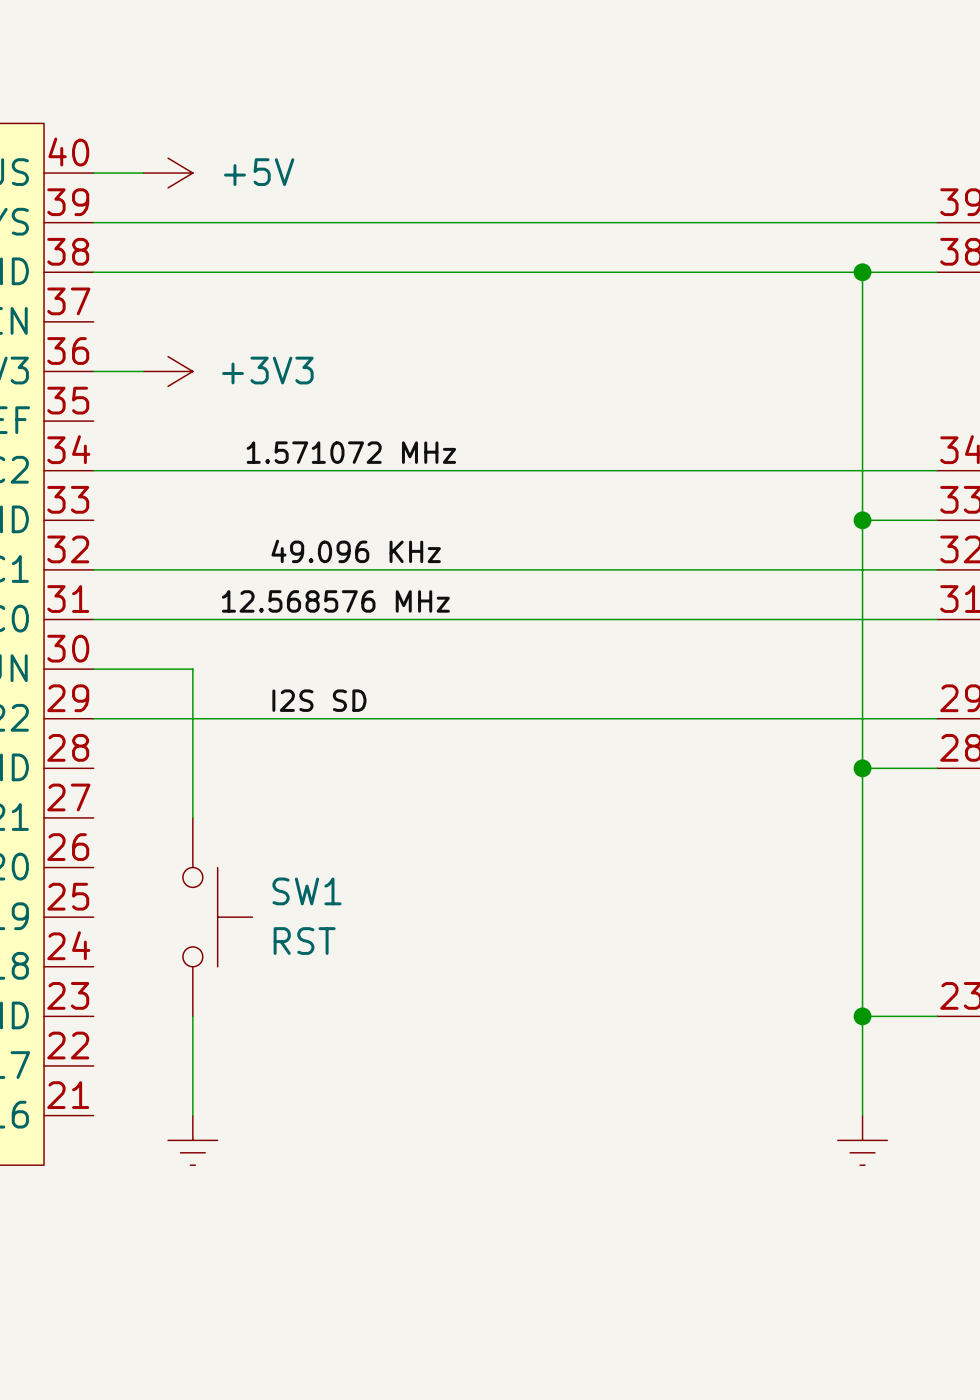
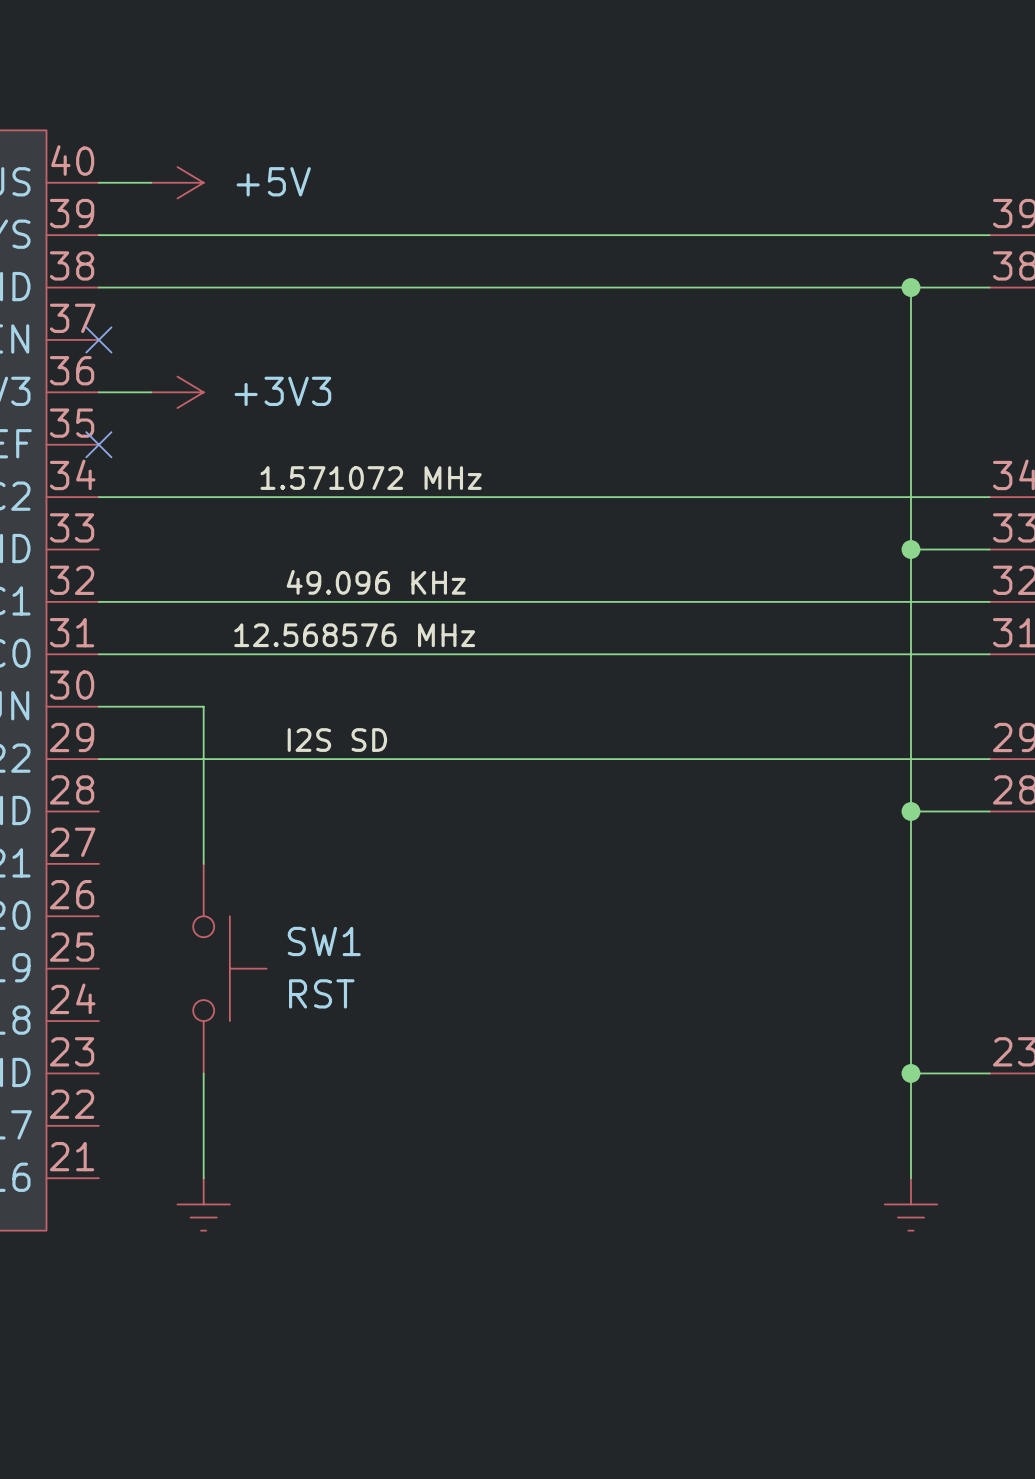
no-connect mark: none -> (98, 339)
no-connect mark: none -> (98, 444)

